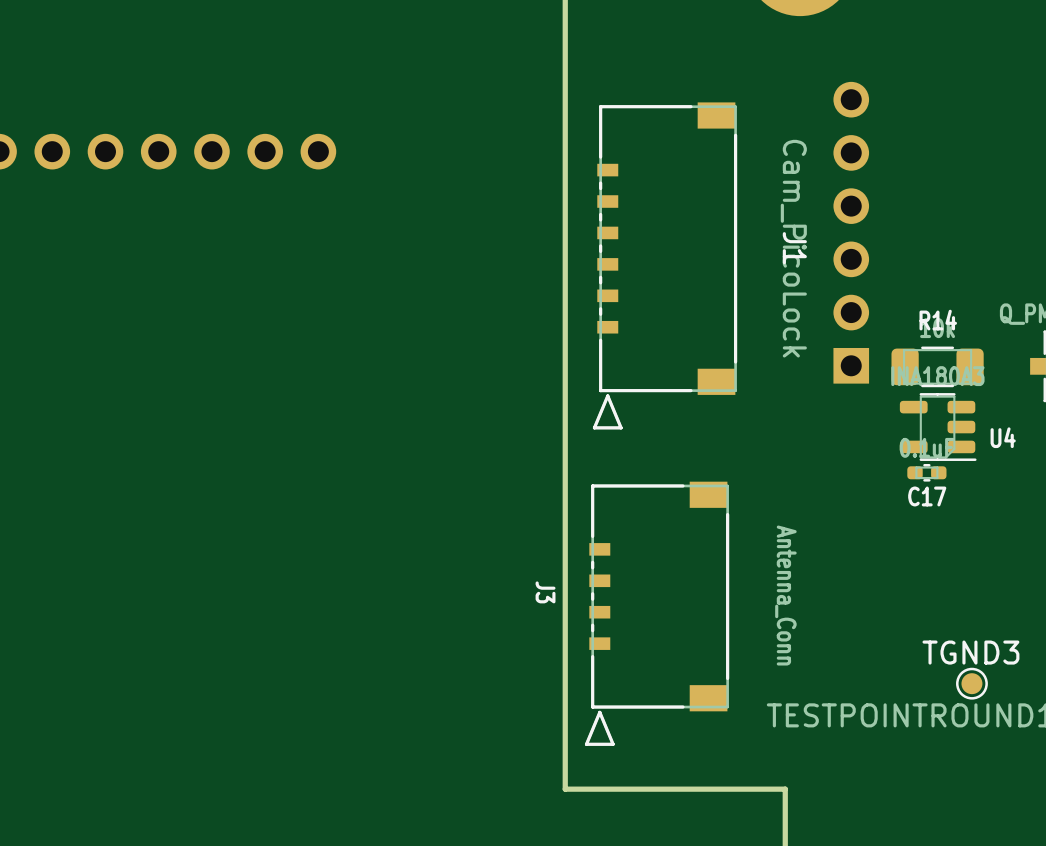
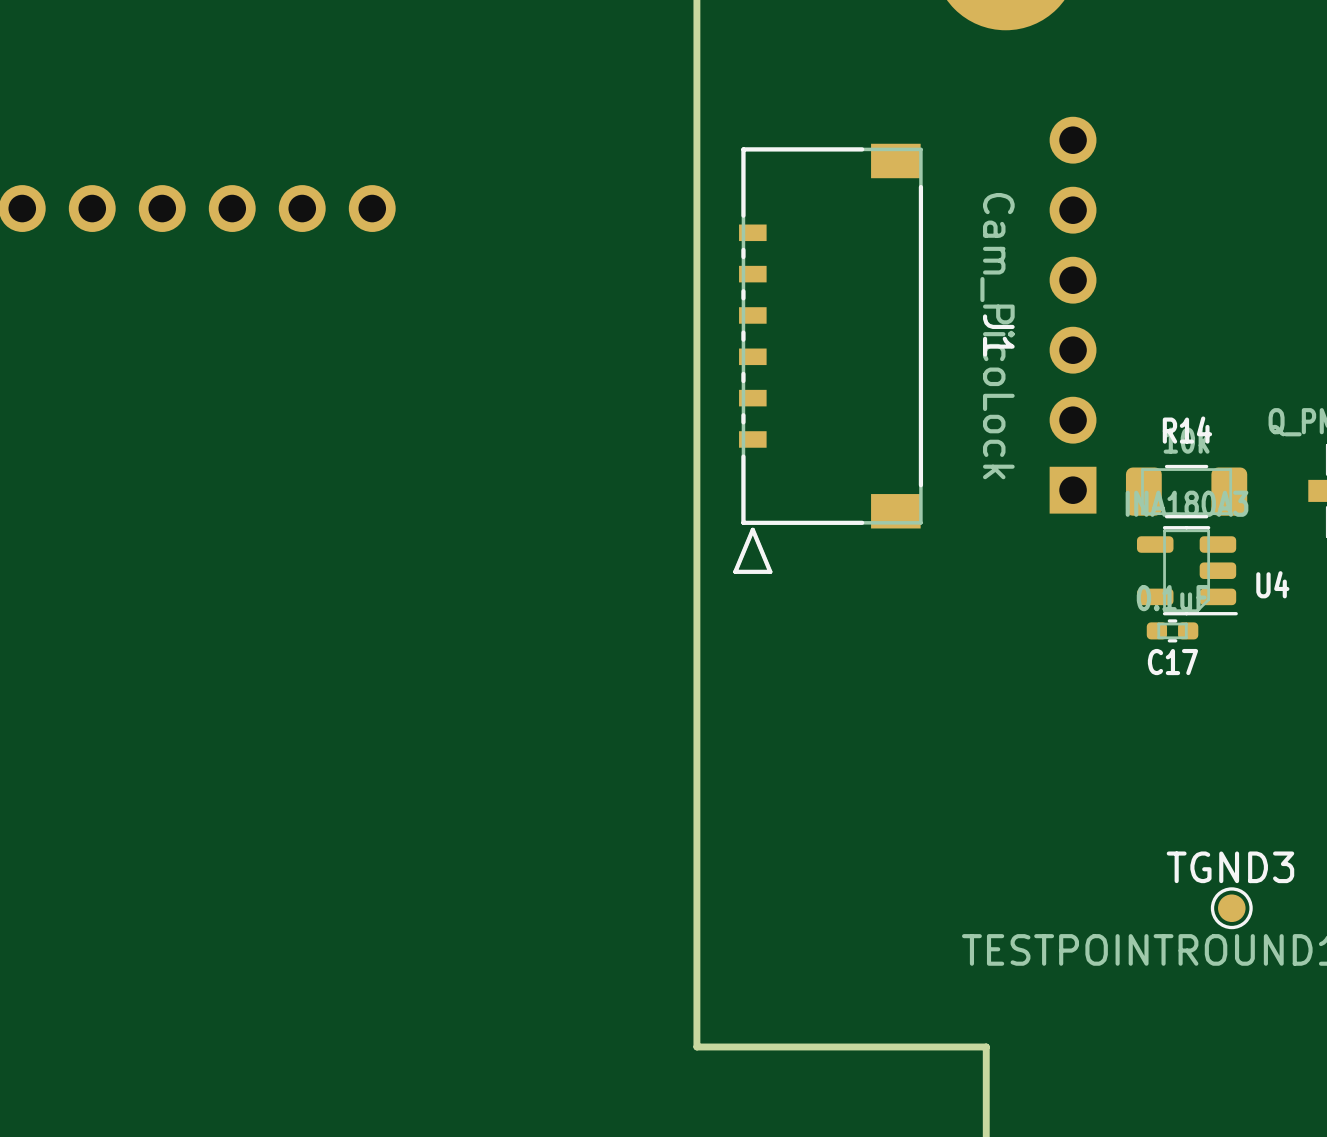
J3: Antenna_Conn (657, 613) -> none

